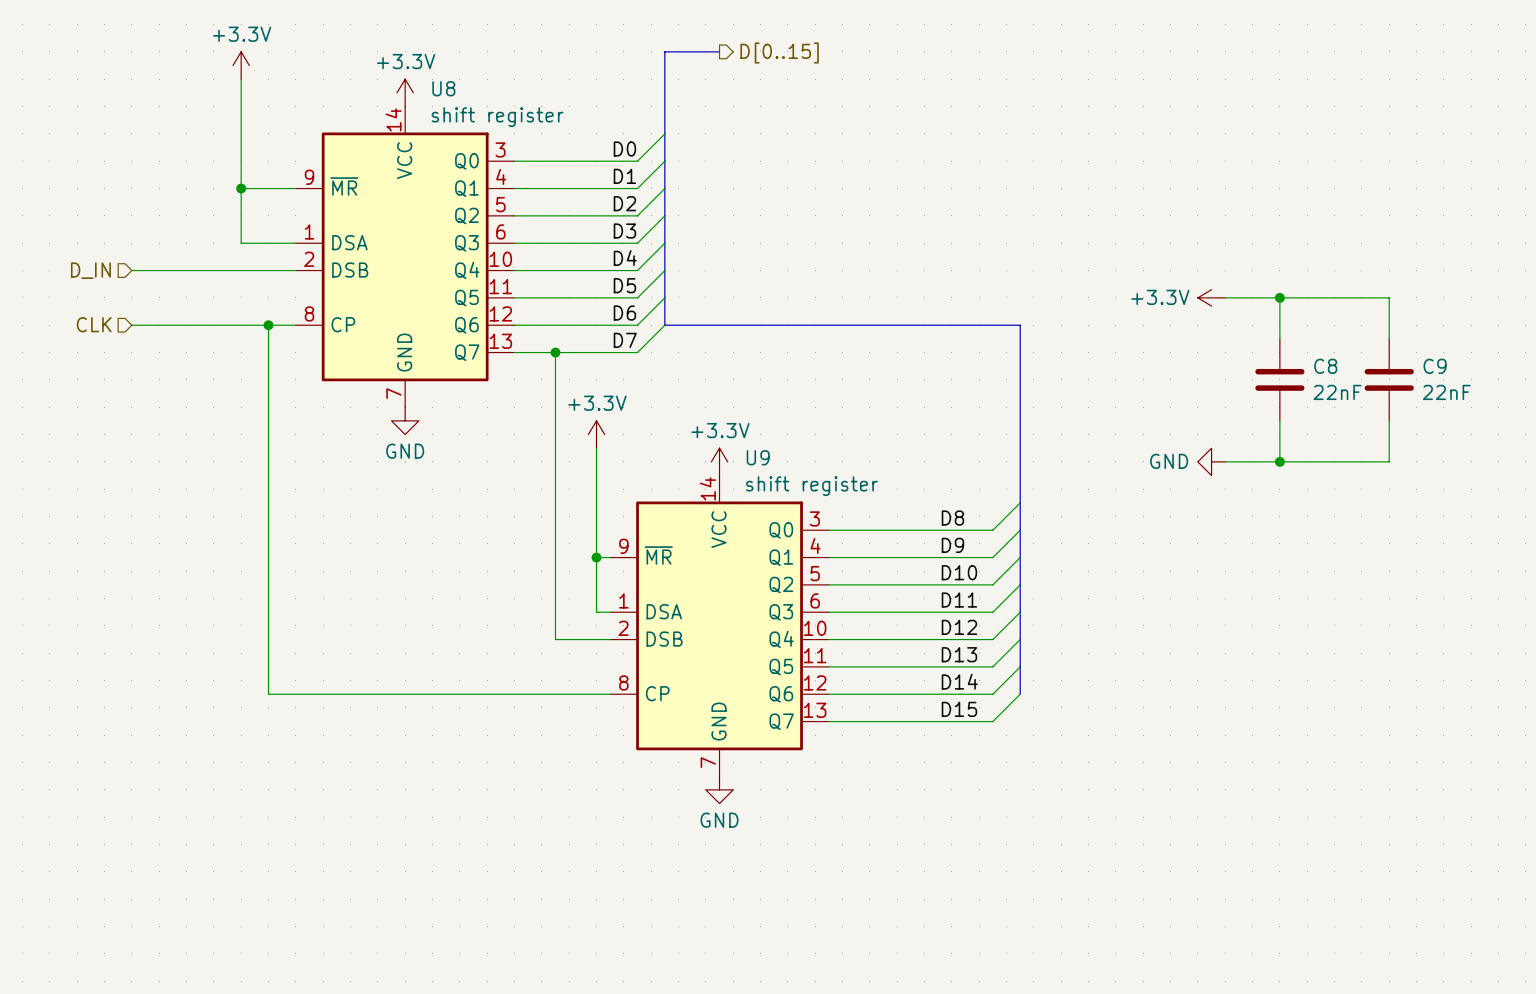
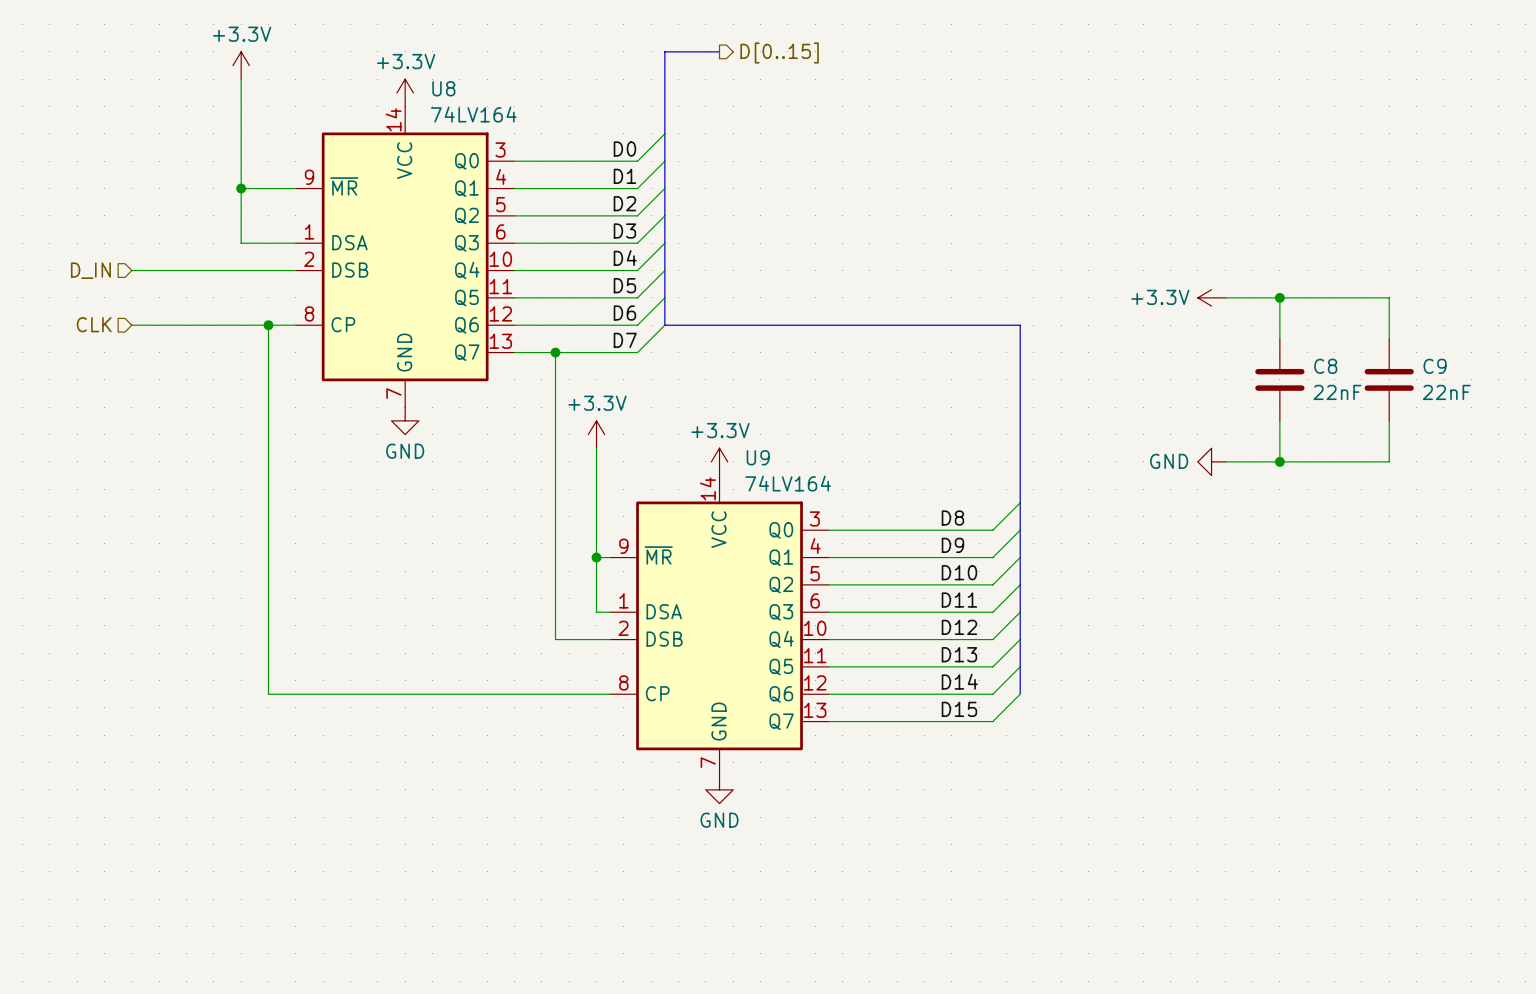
U8 value: shift register (497, 117) -> 74LV164 (473, 114)
U9 value: shift register (811, 486) -> 74LV164 (788, 483)

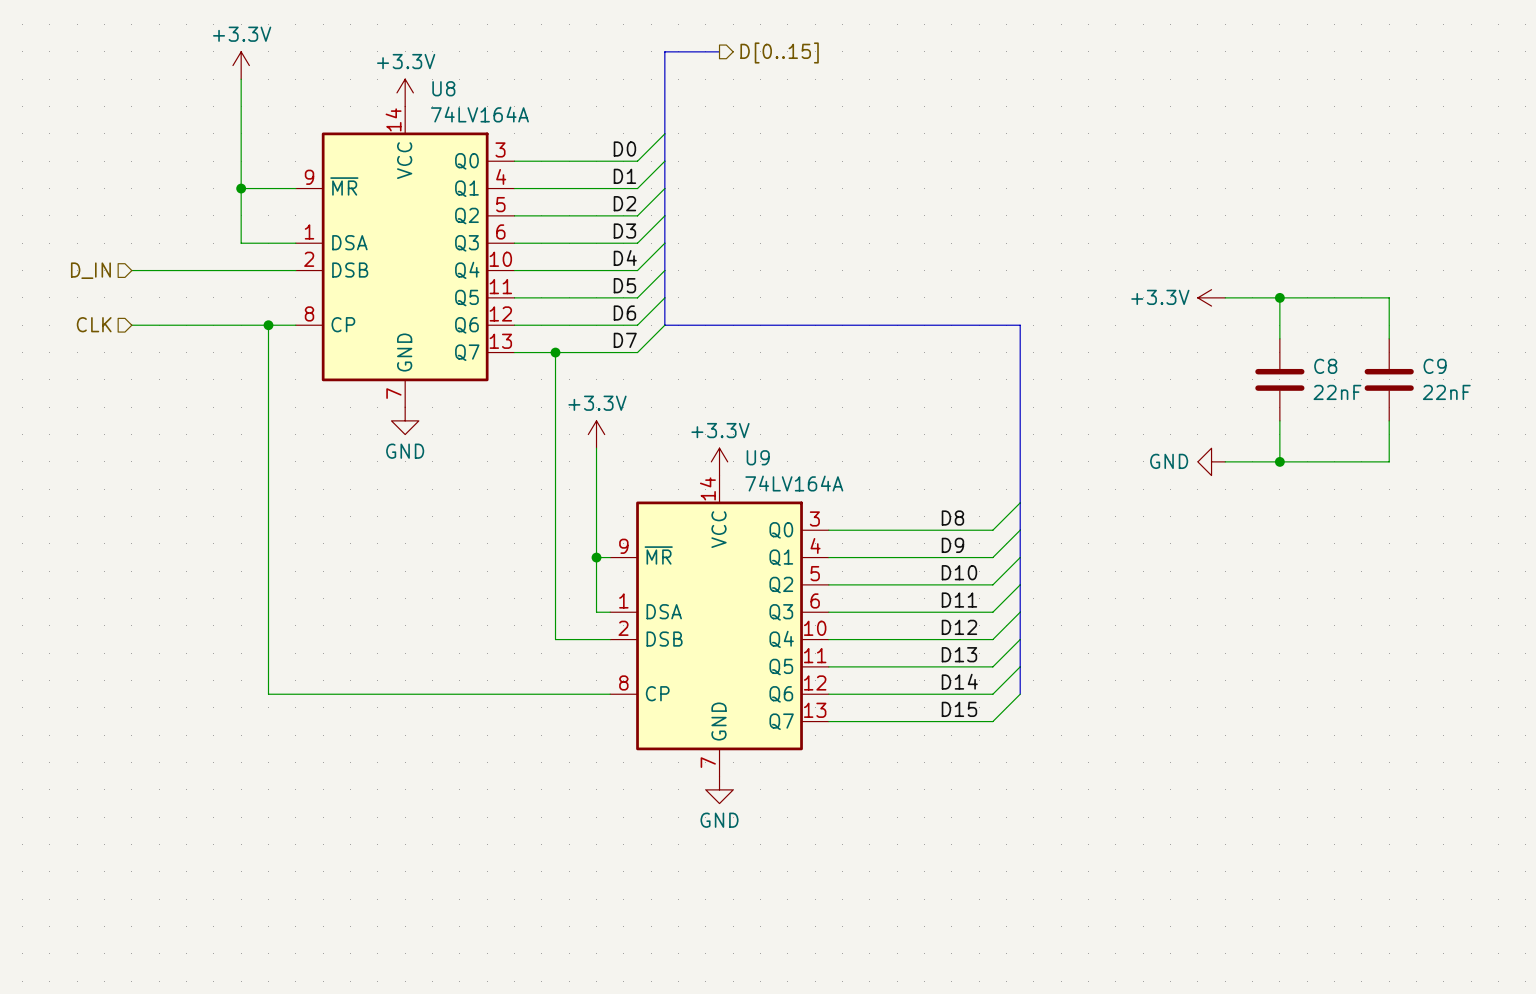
U8 value: 74LV164 (473, 114) -> 74LV164A (479, 114)
U9 value: 74LV164 (788, 483) -> 74LV164A (794, 483)

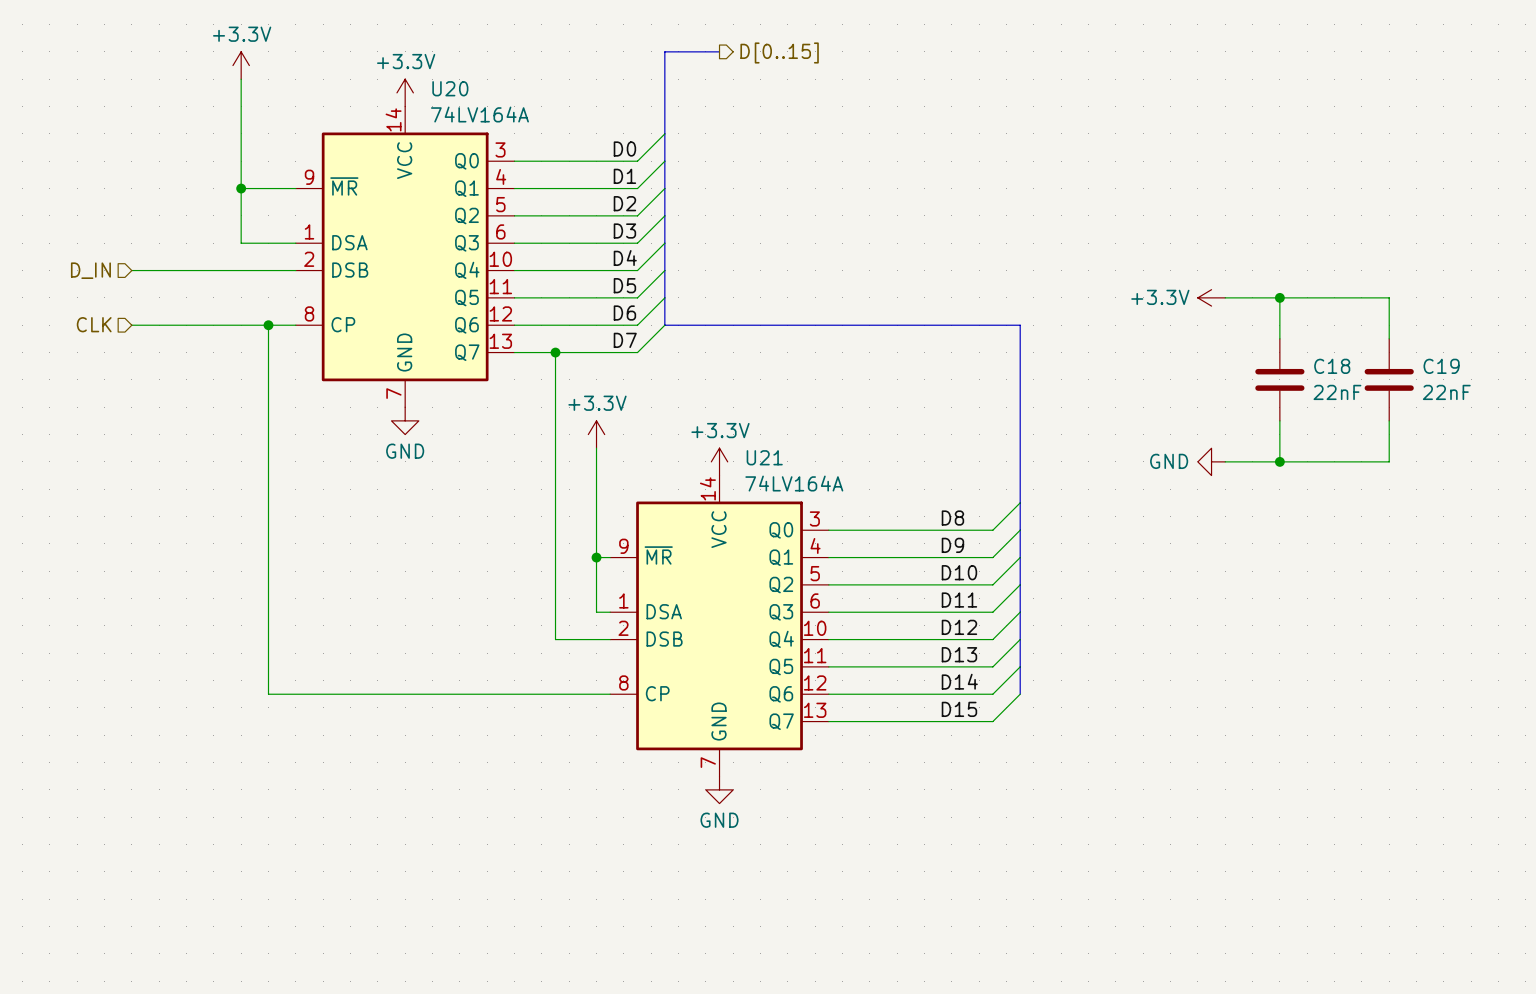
U8 name: U8 (443, 88) -> U20 (450, 88)
C8 name: C8 (1325, 366) -> C18 (1332, 366)
C9 name: C9 (1435, 366) -> C19 (1441, 366)
U9 name: U9 (758, 457) -> U21 (764, 457)

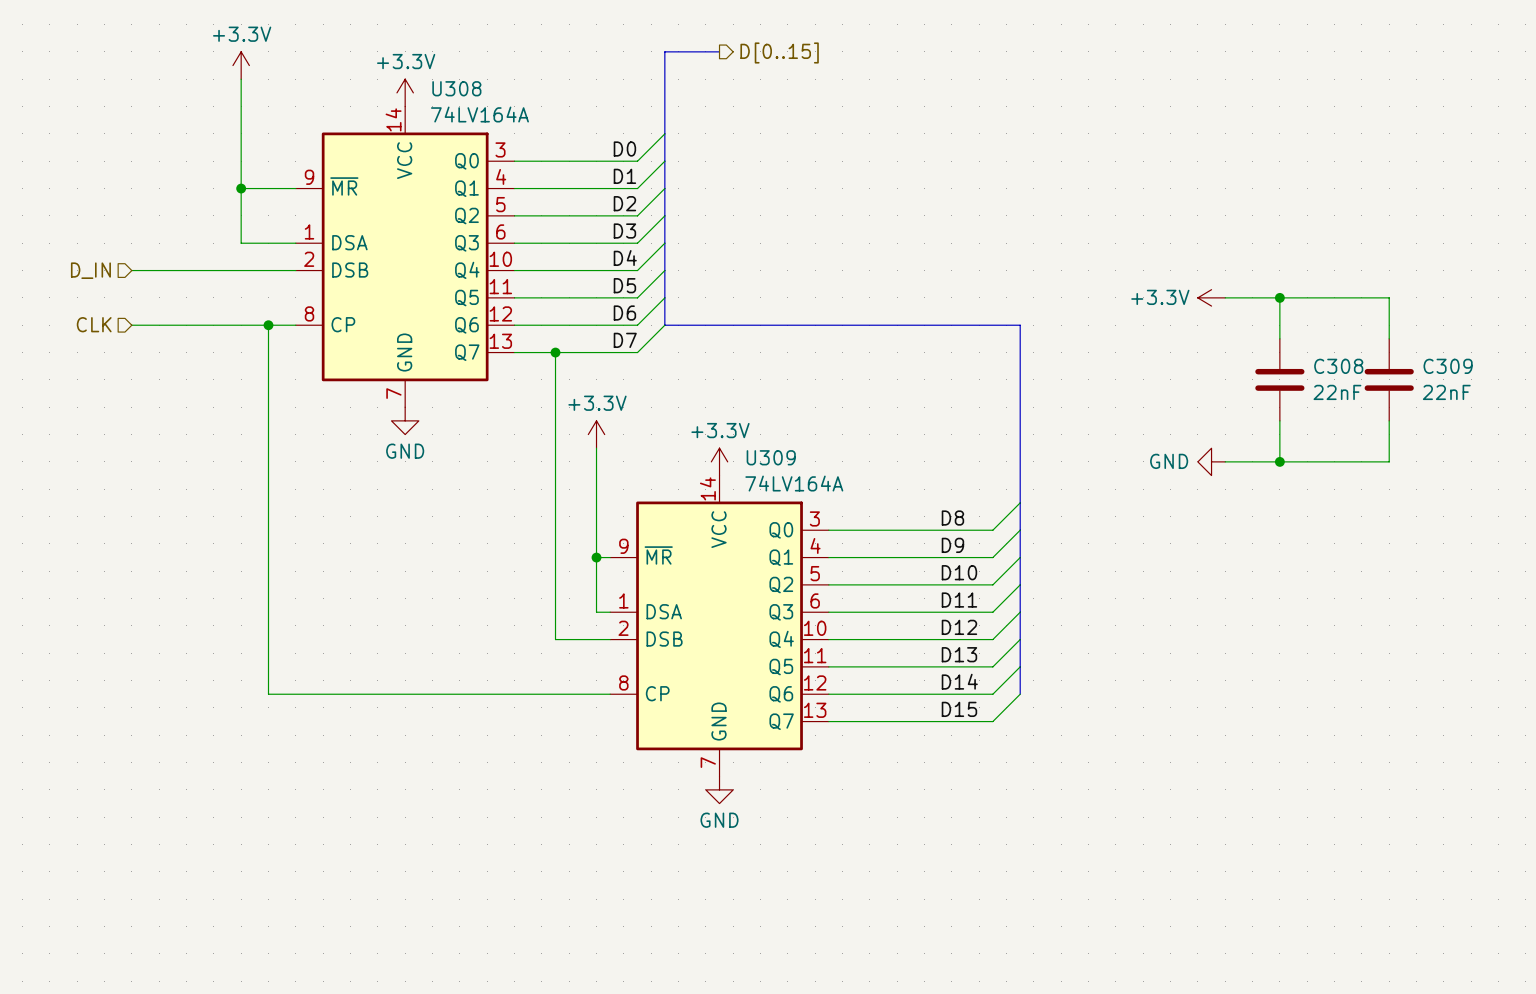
U20 name: U20 (450, 88) -> U308 (456, 88)
C18 name: C18 (1332, 366) -> C308 (1338, 366)
C19 name: C19 (1441, 366) -> C309 (1448, 366)
U21 name: U21 (764, 457) -> U309 (771, 457)

